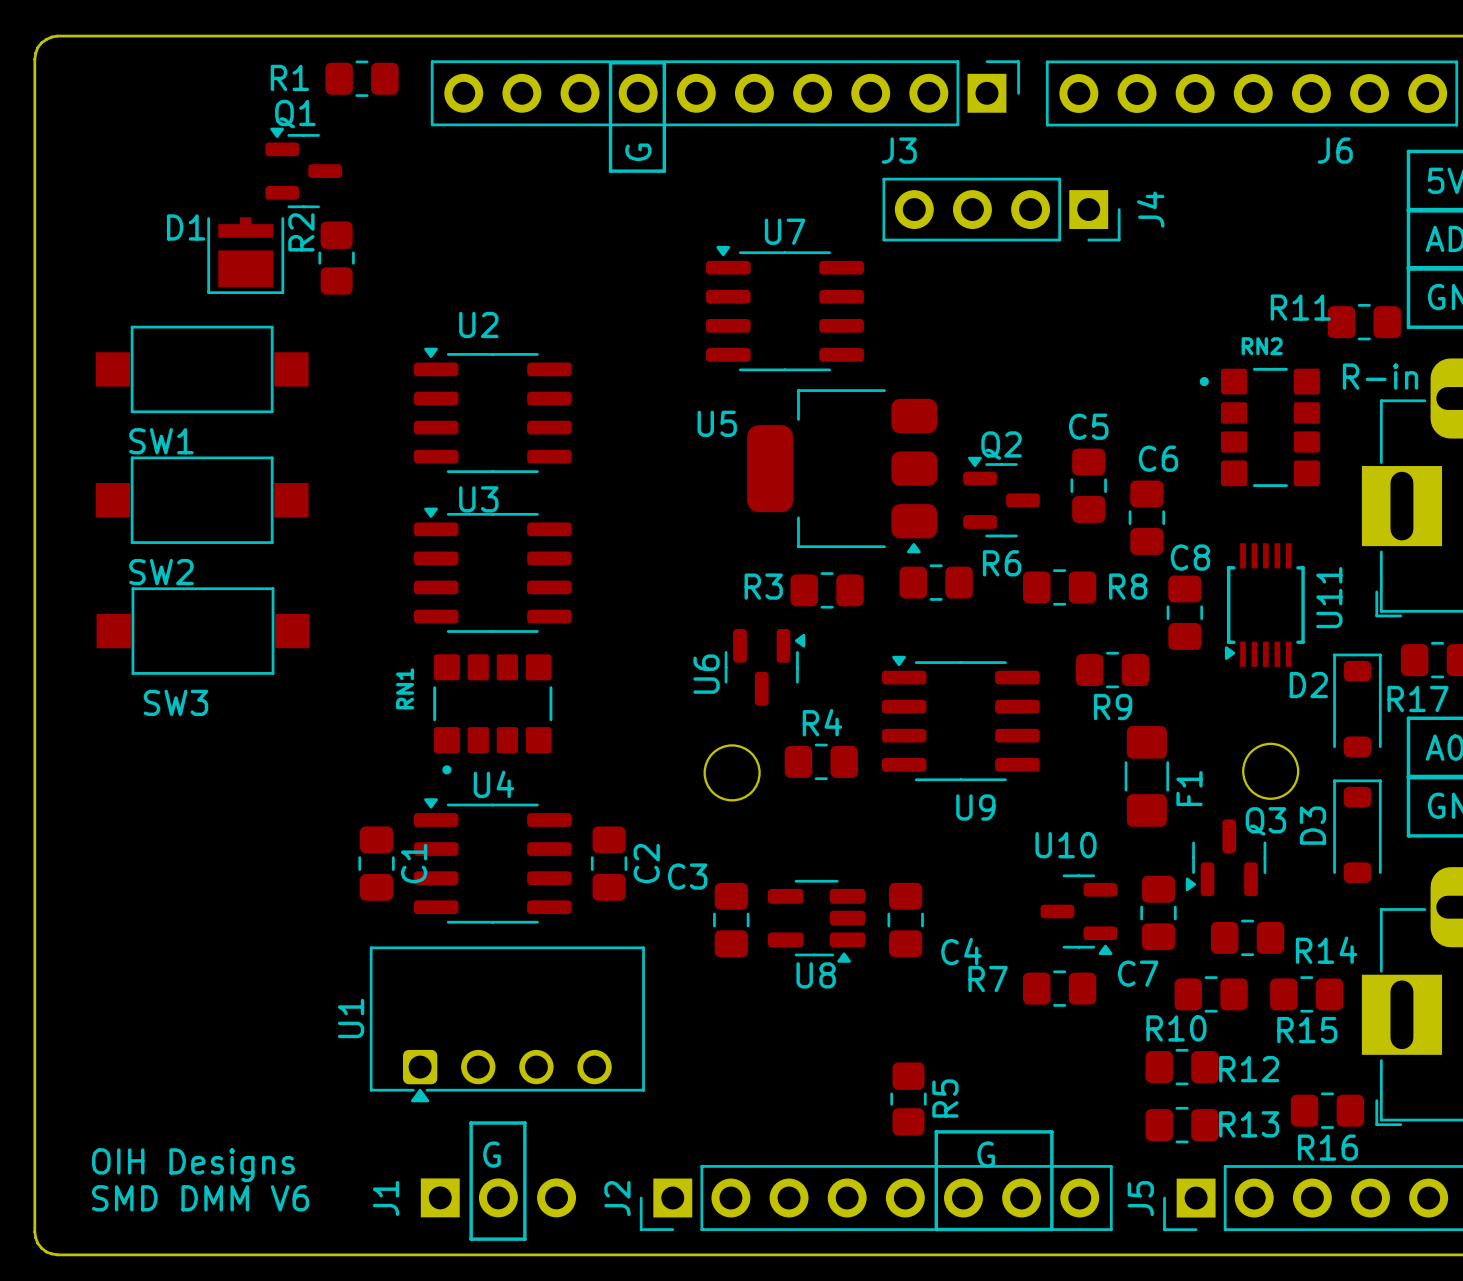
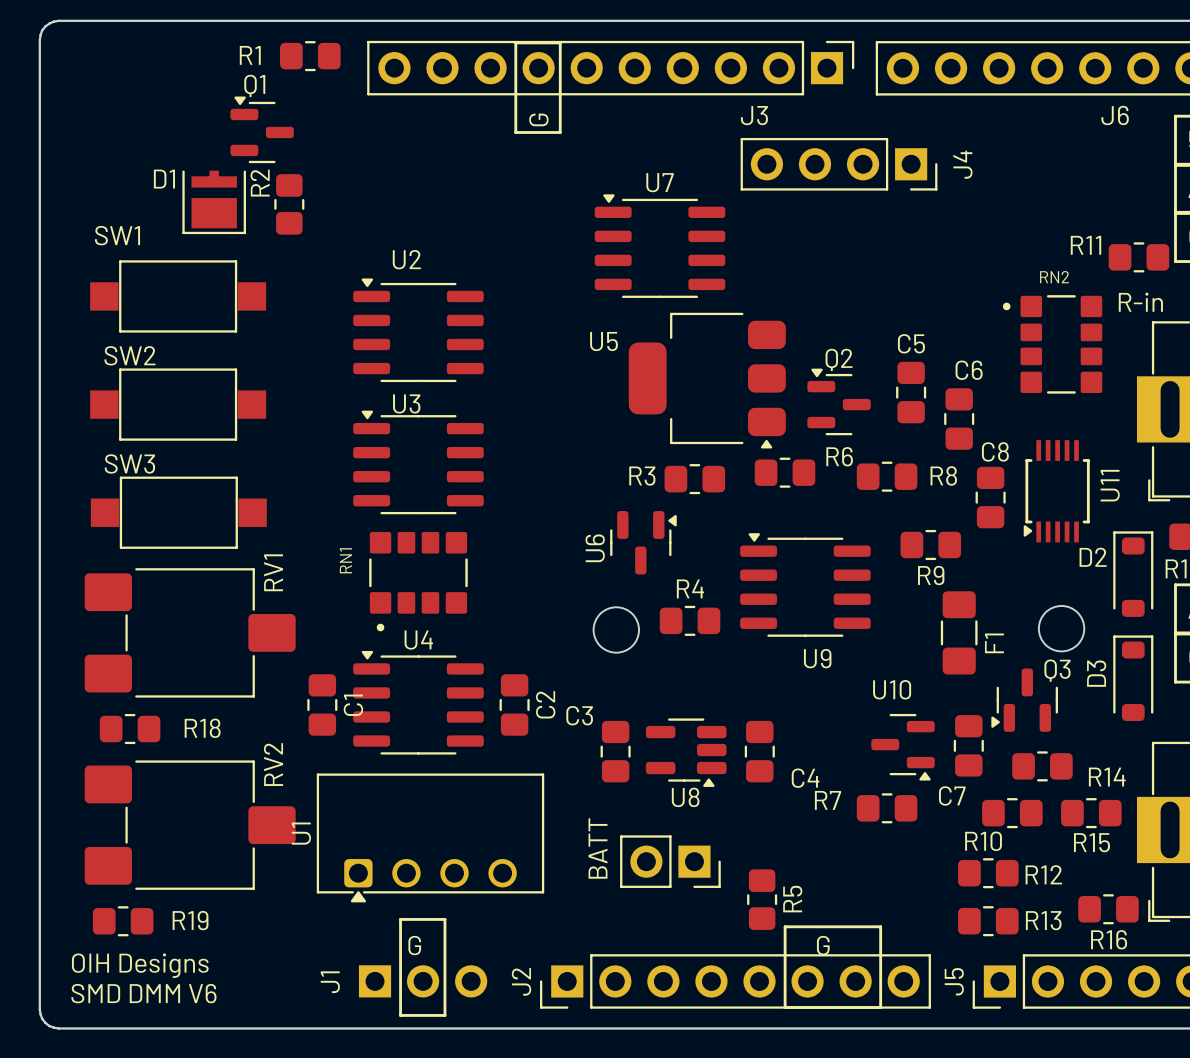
SW1 name position: SW1 (161, 441) -> SW1 (117, 235)
SW2 name position: SW2 (161, 572) -> SW2 (130, 355)
SW3 name position: SW3 (175, 702) -> SW3 (129, 463)
RV1: none -> (190, 632)
R18: none -> (130, 729)
RV2: none -> (190, 825)
text: none -> BATT (598, 848)
part: none -> (670, 861)
R19: none -> (123, 921)
text position: OIH Designs (193, 1165) -> OIH Designs (140, 965)
text position: SMD DMM V6 (200, 1198) -> SMD DMM V6 (143, 993)

